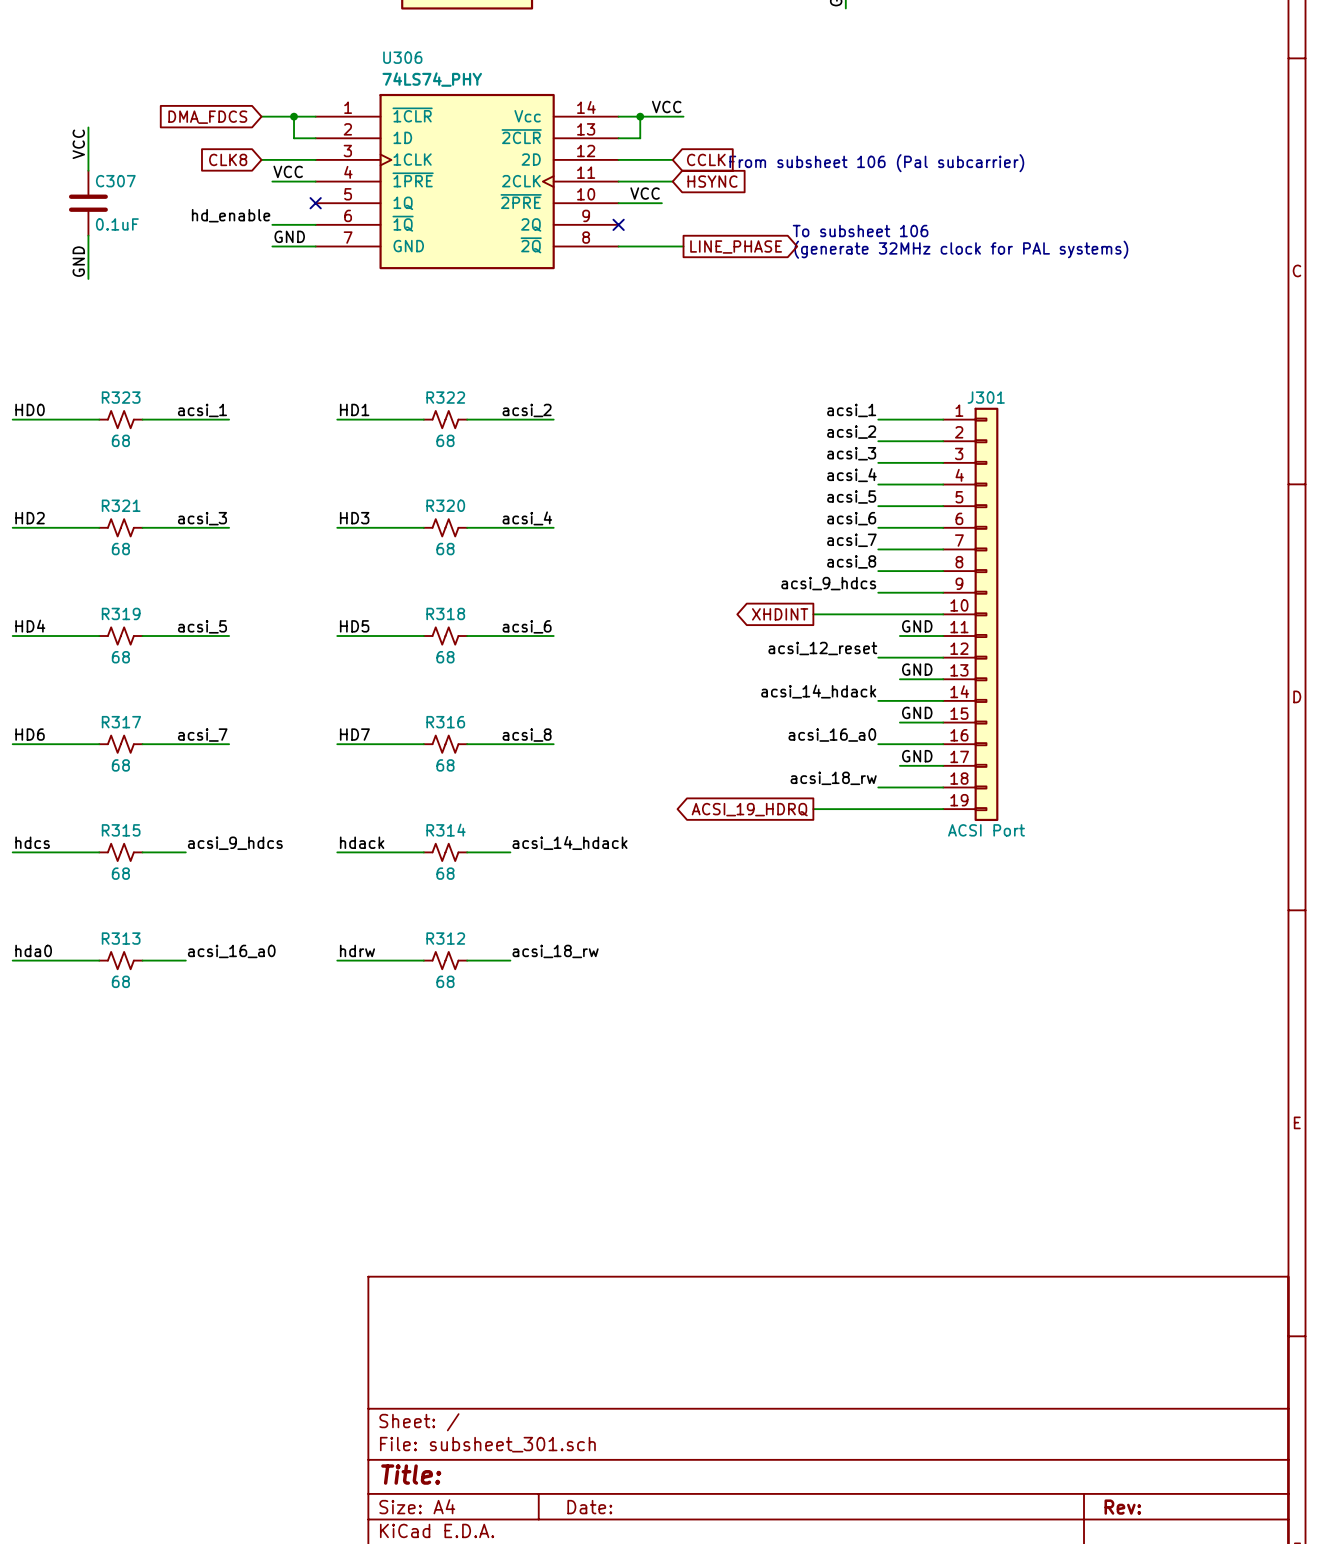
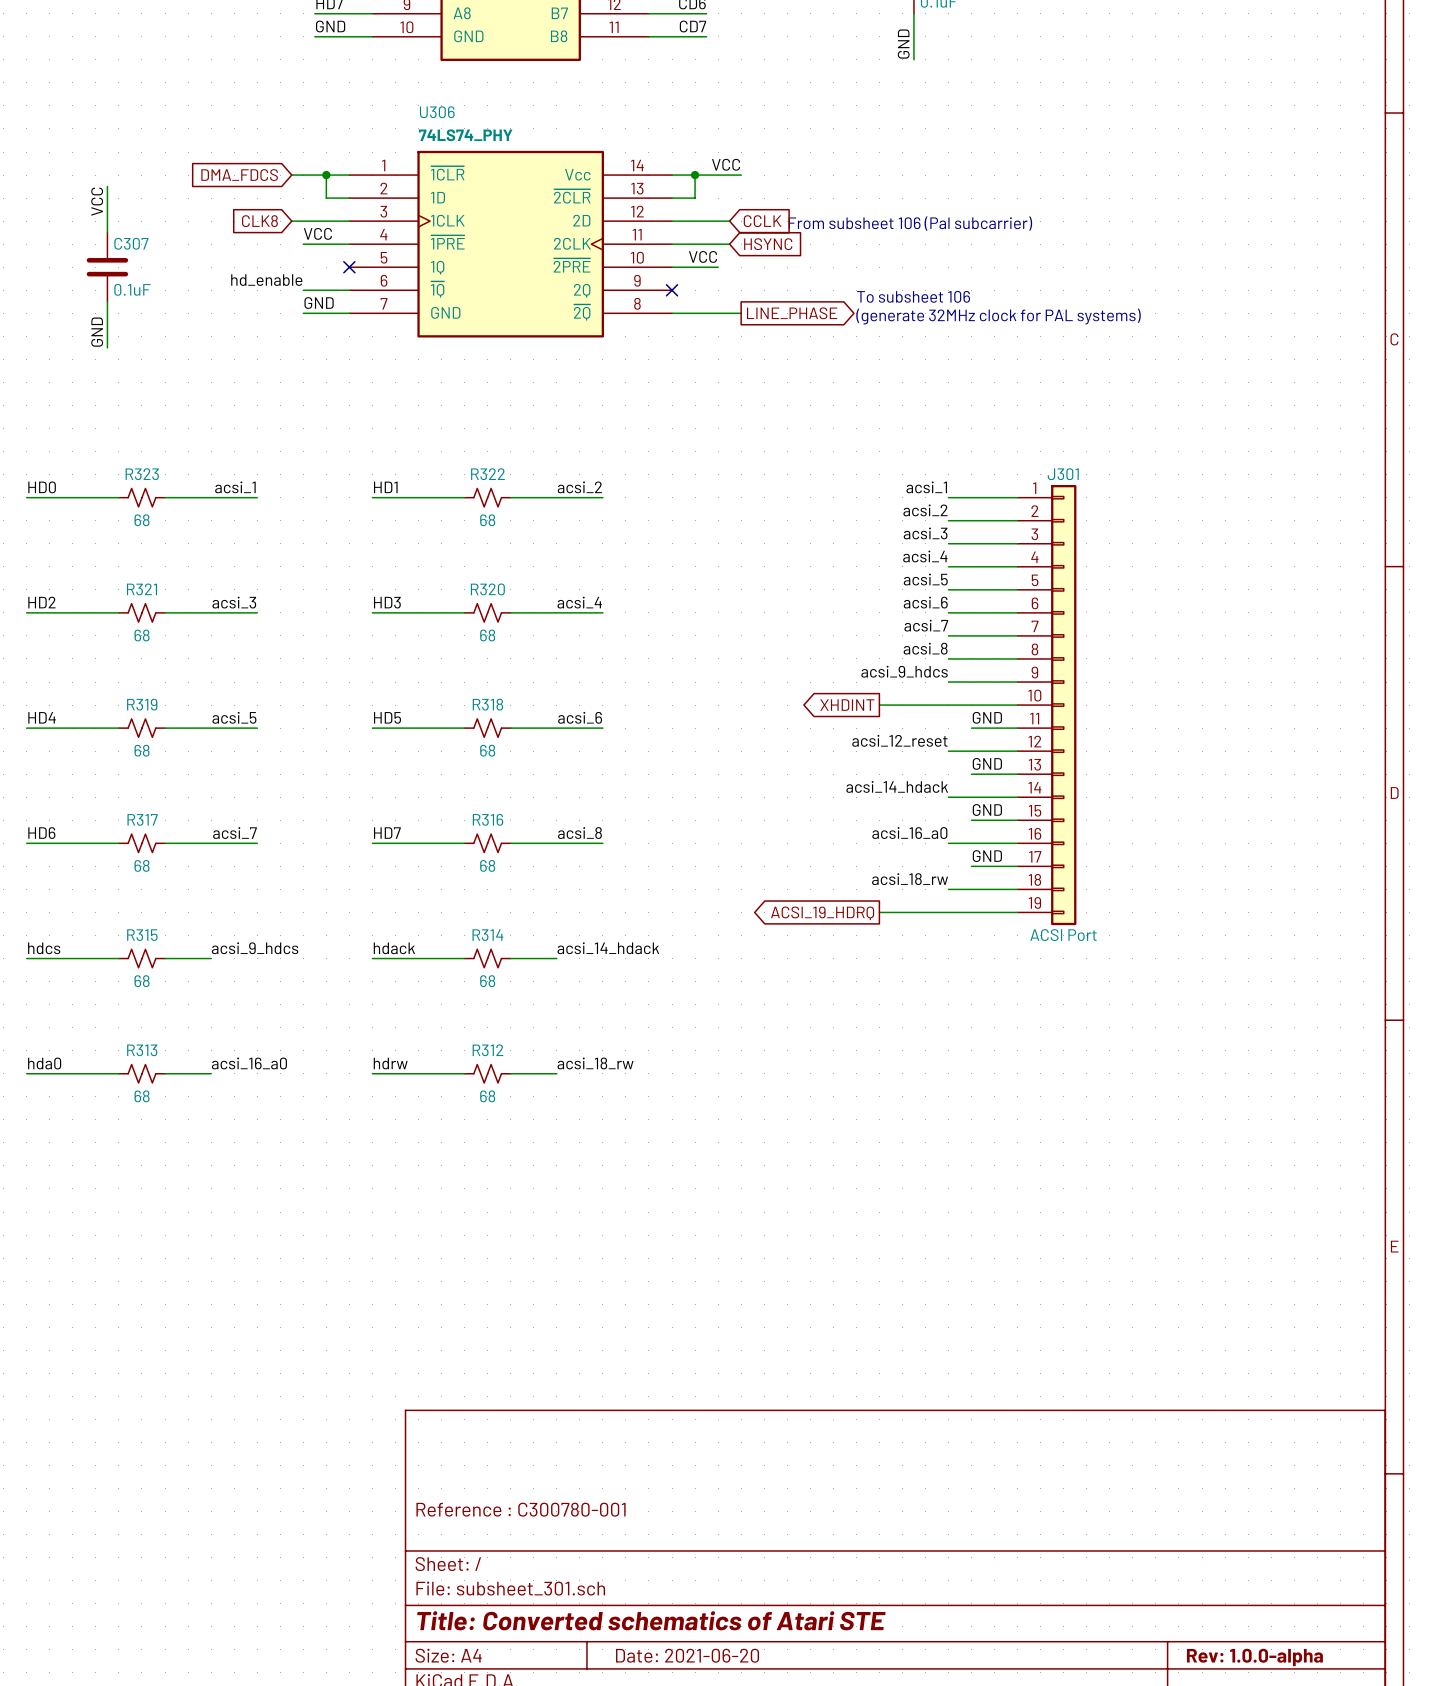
title block: none -> Reference : C300780-001 (521, 1509)
title block: Title: (411, 1474) -> Title: Converted schematics of Atari STE (651, 1620)
title block: Date: (589, 1507) -> Date: 2021-06-20 (687, 1655)
title block: Rev: (1122, 1507) -> Rev: 1.0.0-alpha (1254, 1657)

